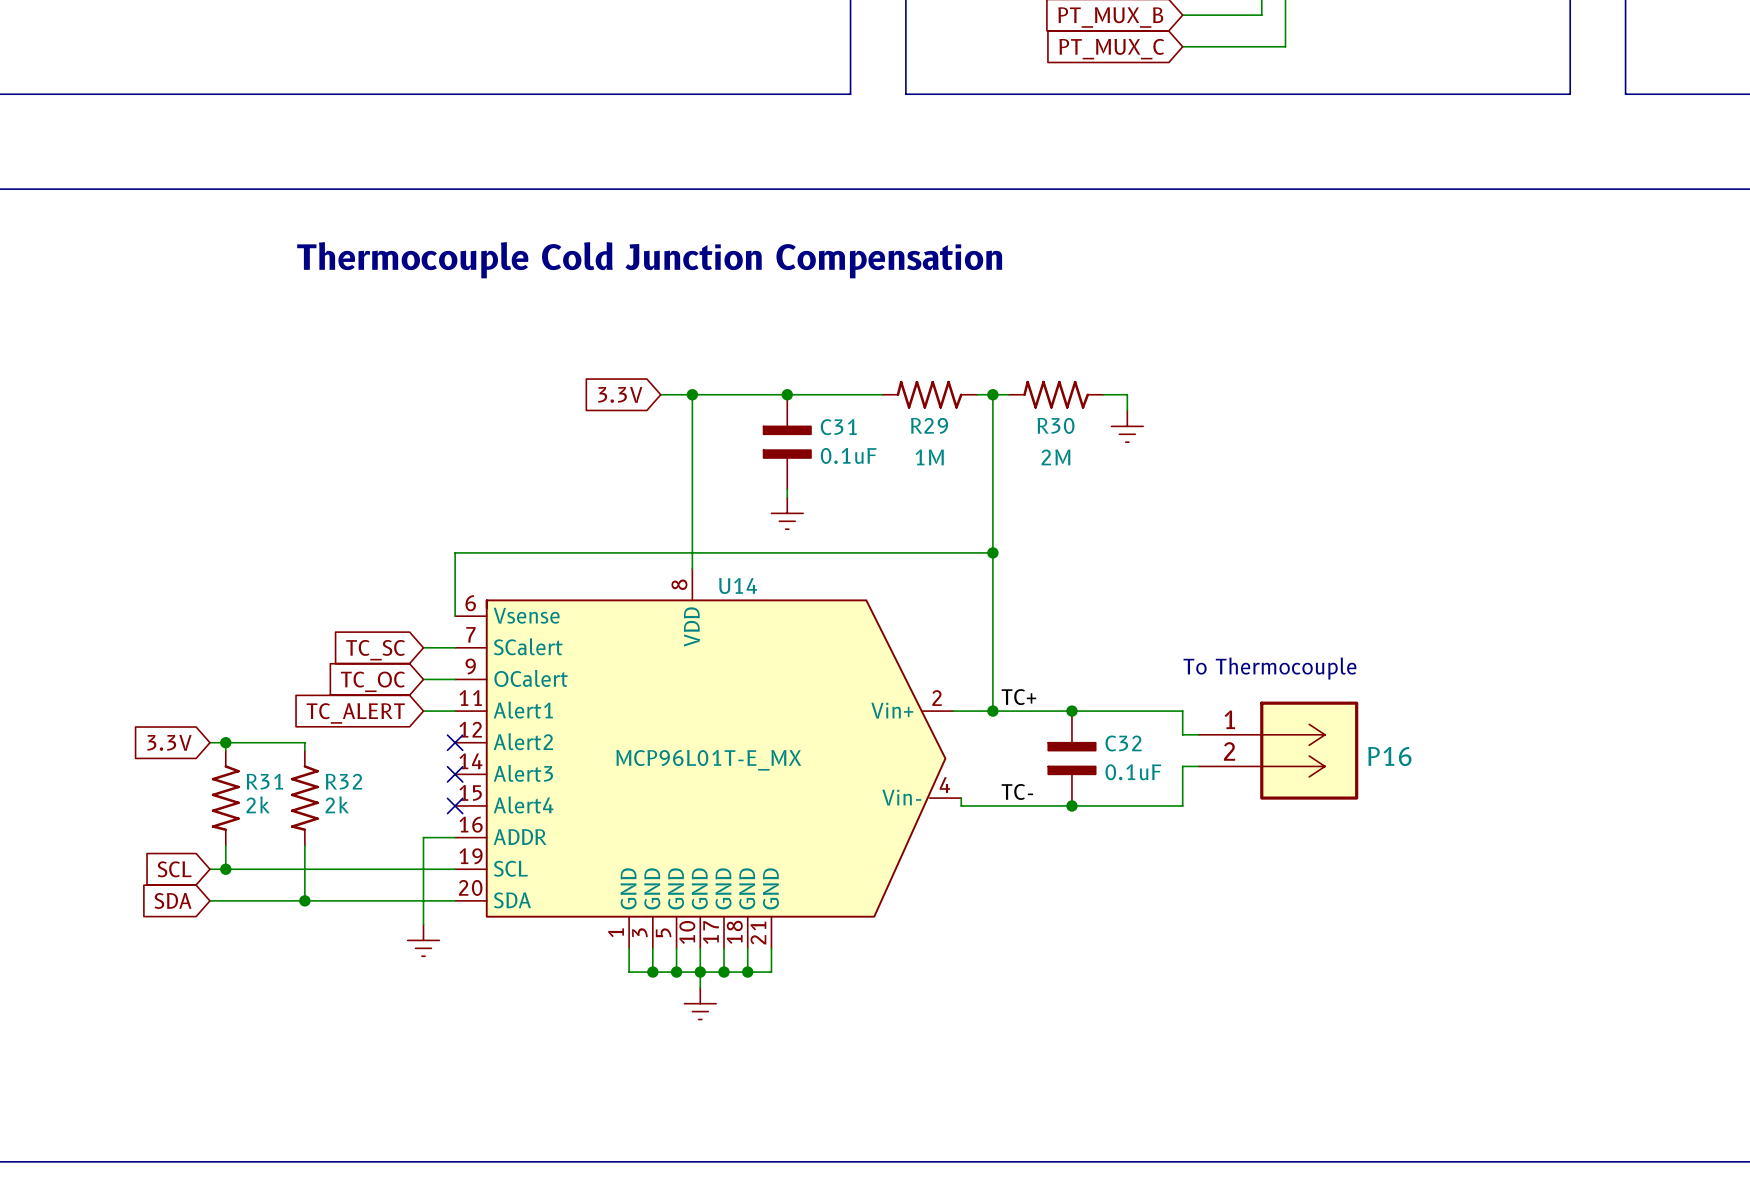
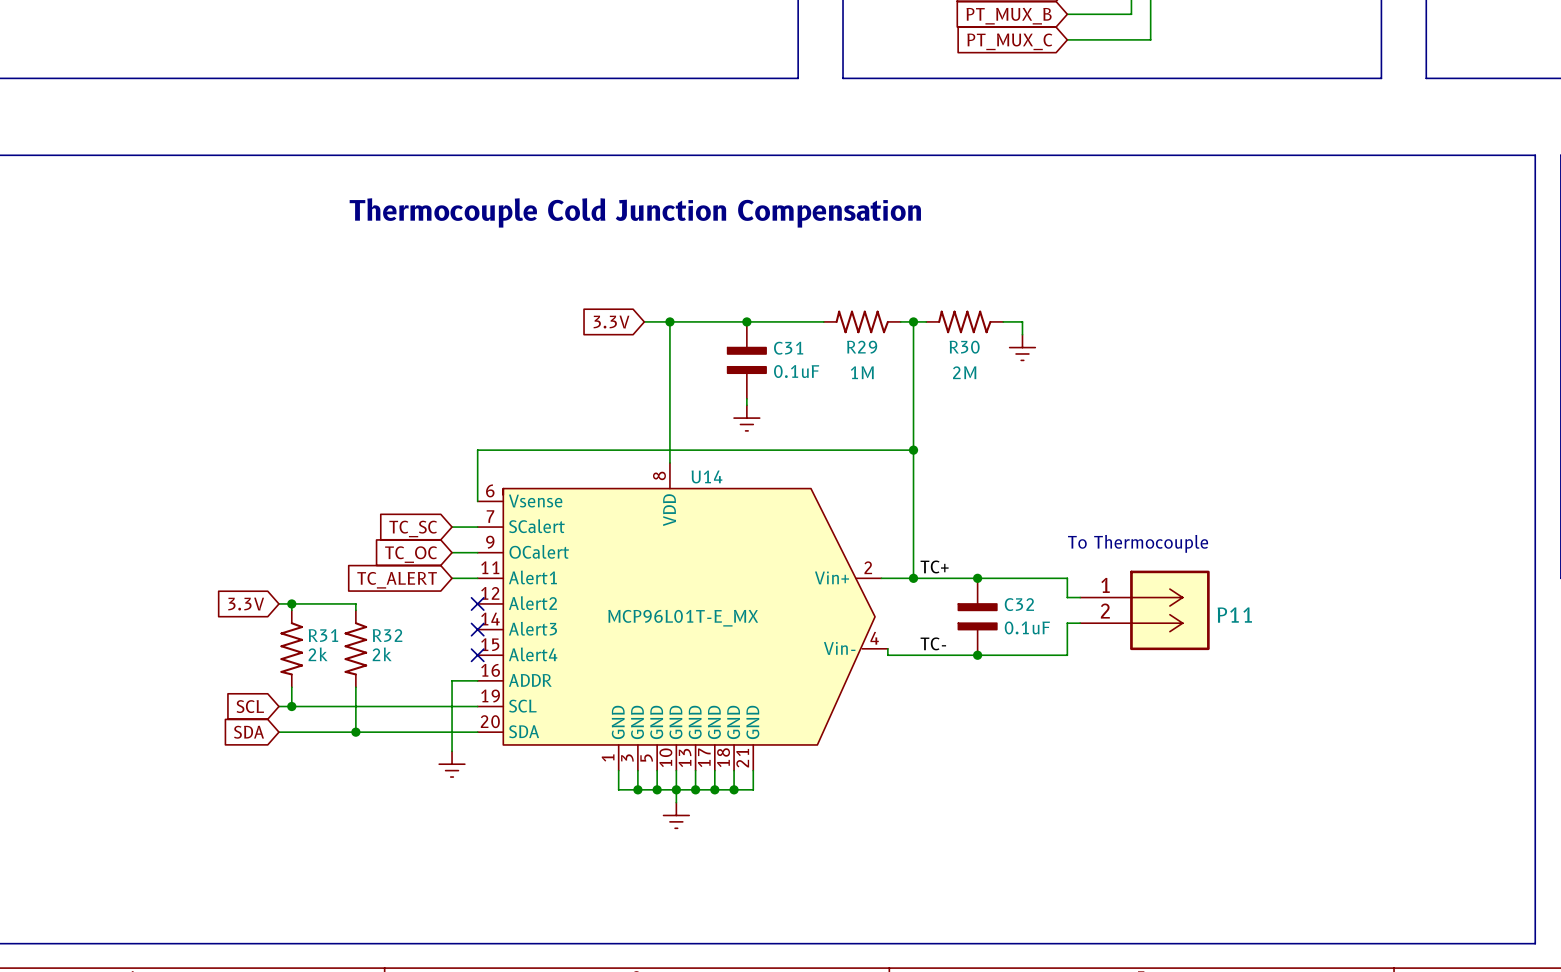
U14 symbol: [455, 568, 962, 949] -> [477, 462, 888, 771]
P16 name: P16 (1389, 756) -> P11 (1234, 615)
wire: none -> (753, 770) (753, 789) (734, 789)
junction: none -> (734, 789)

